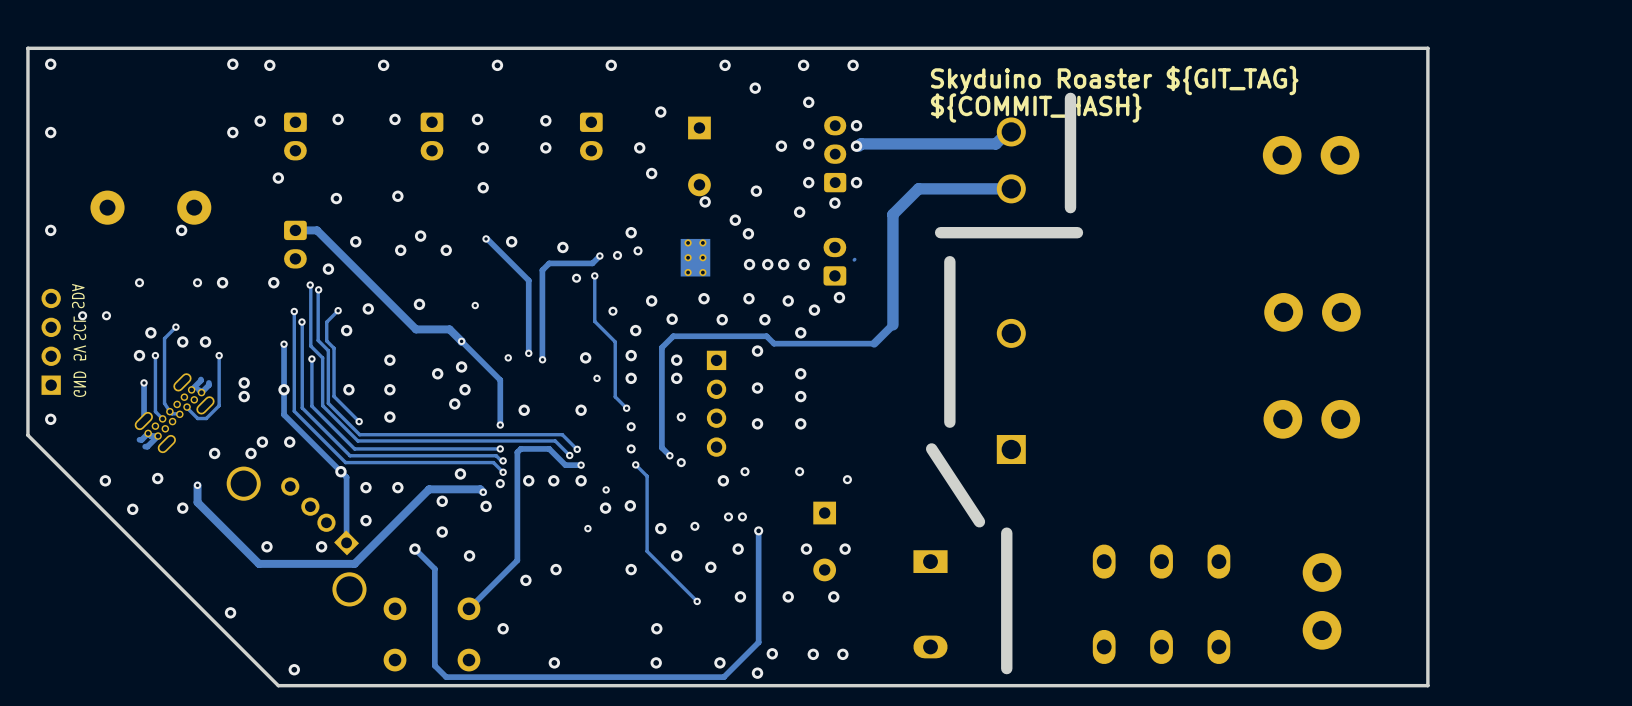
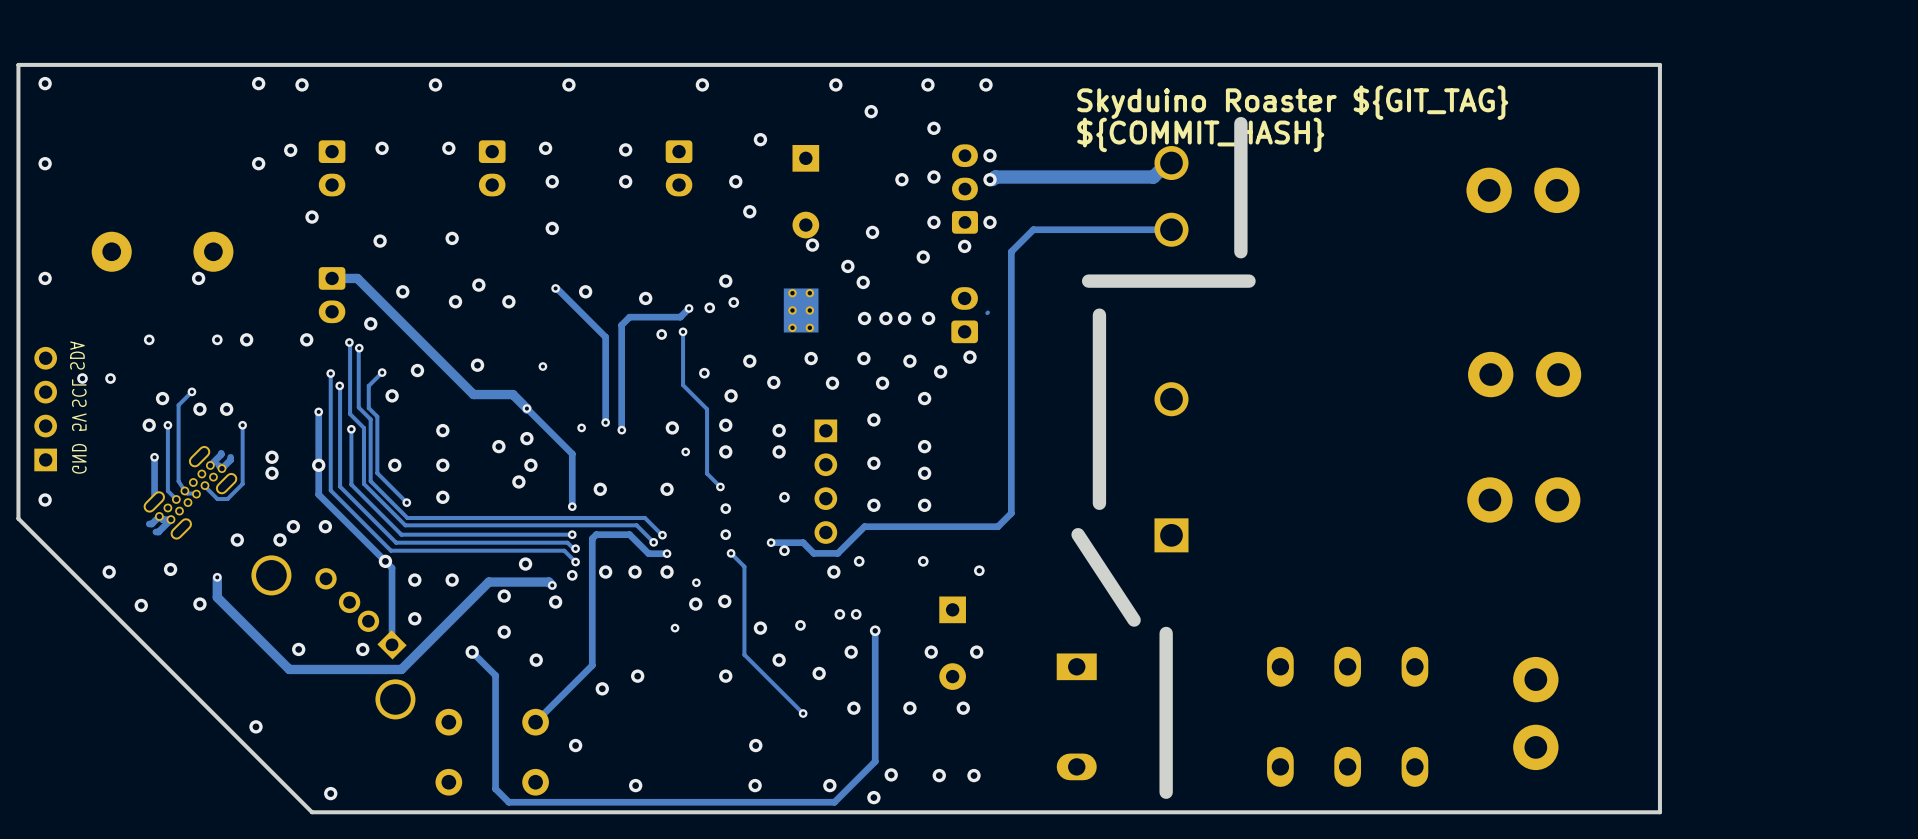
track: (918, 188) (892, 214) (892, 324) (874, 343) (774, 343) (766, 336) (673, 336) (661, 347) (661, 447) (669, 455) -> (1062, 229) (1033, 229) (1011, 251) (1011, 513) (998, 526) (864, 526) (837, 553) (813, 553) (803, 542) (771, 542)
track width: thick (1011, 188) (918, 188) -> thin (1171, 229) (1062, 229)

